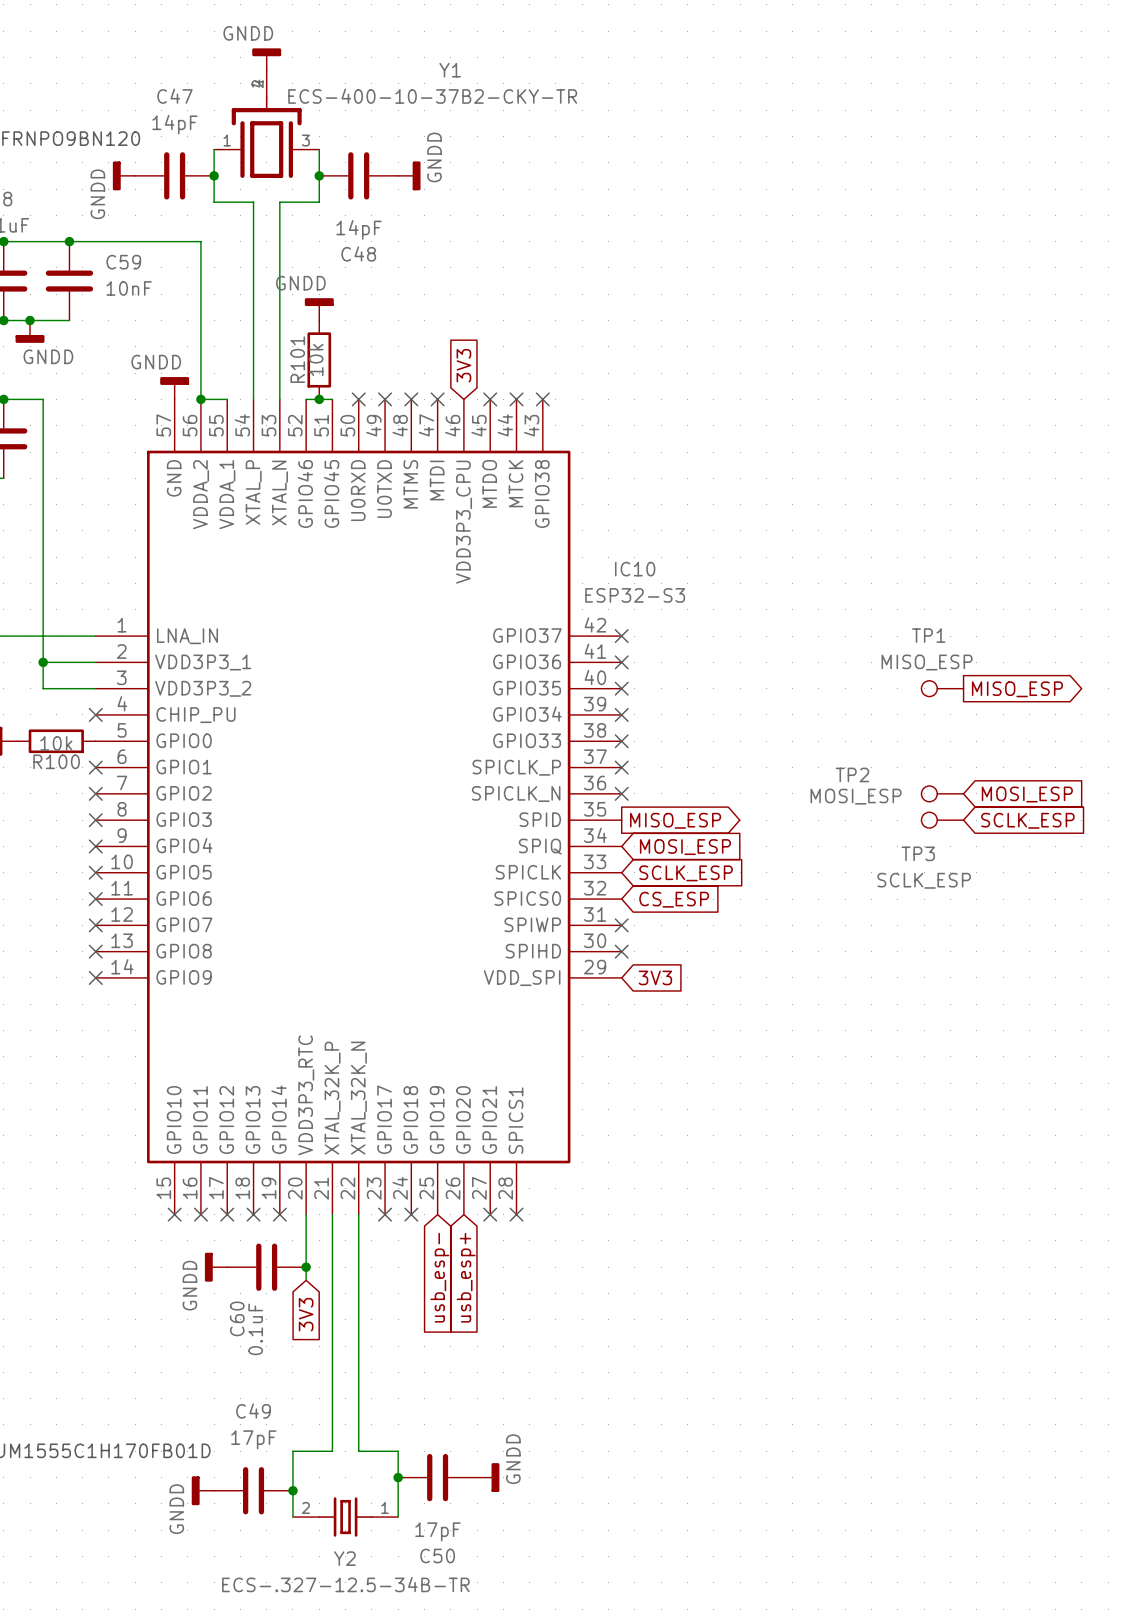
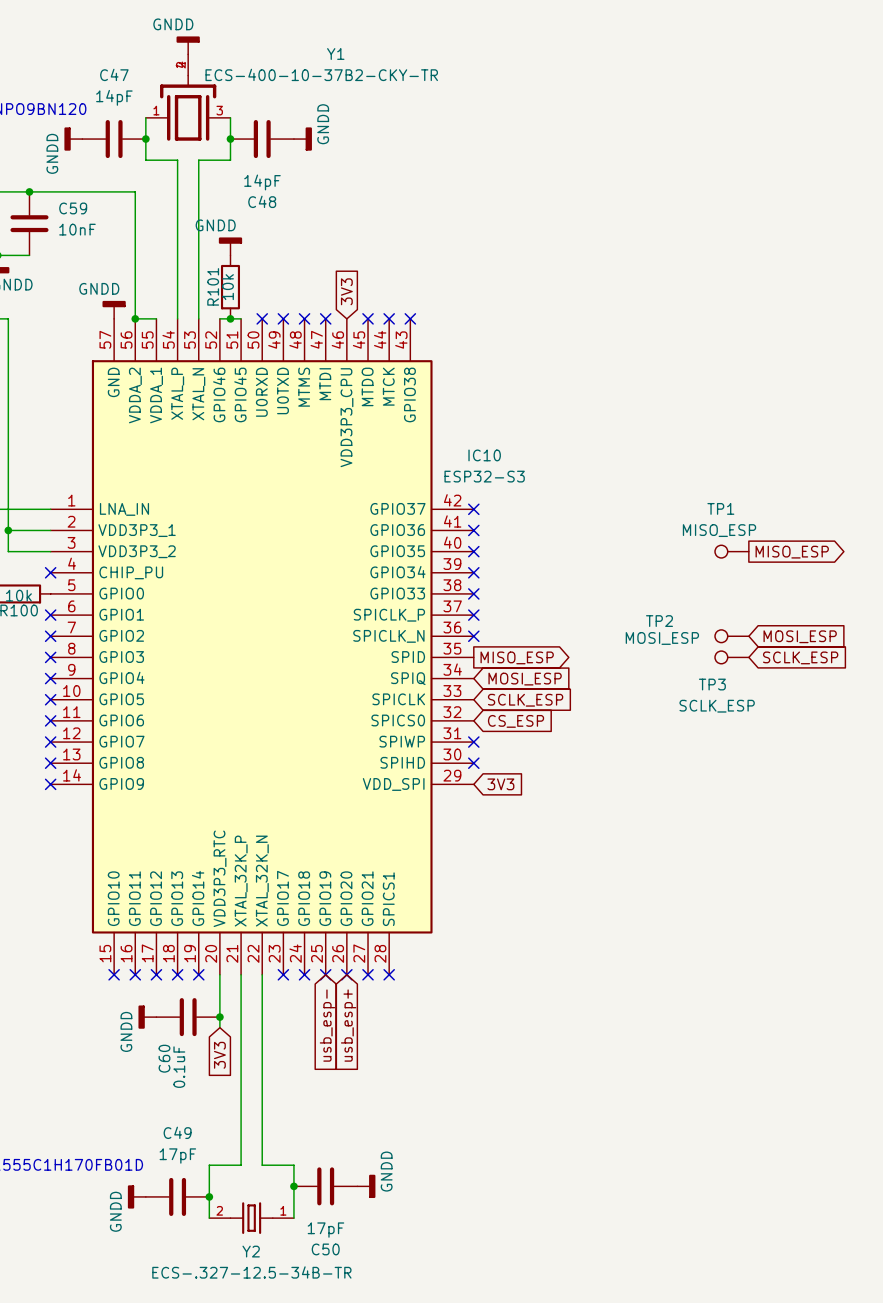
no-connect mark: none -> (325, 974)
no-connect mark: none -> (346, 974)

